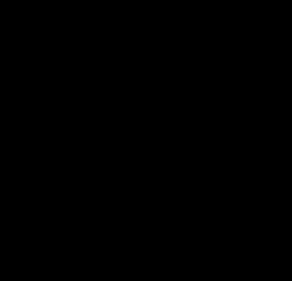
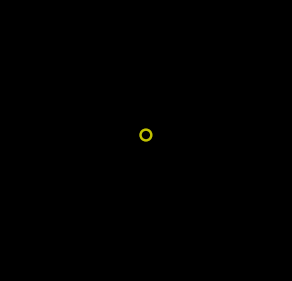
part: none -> (145, 135)

